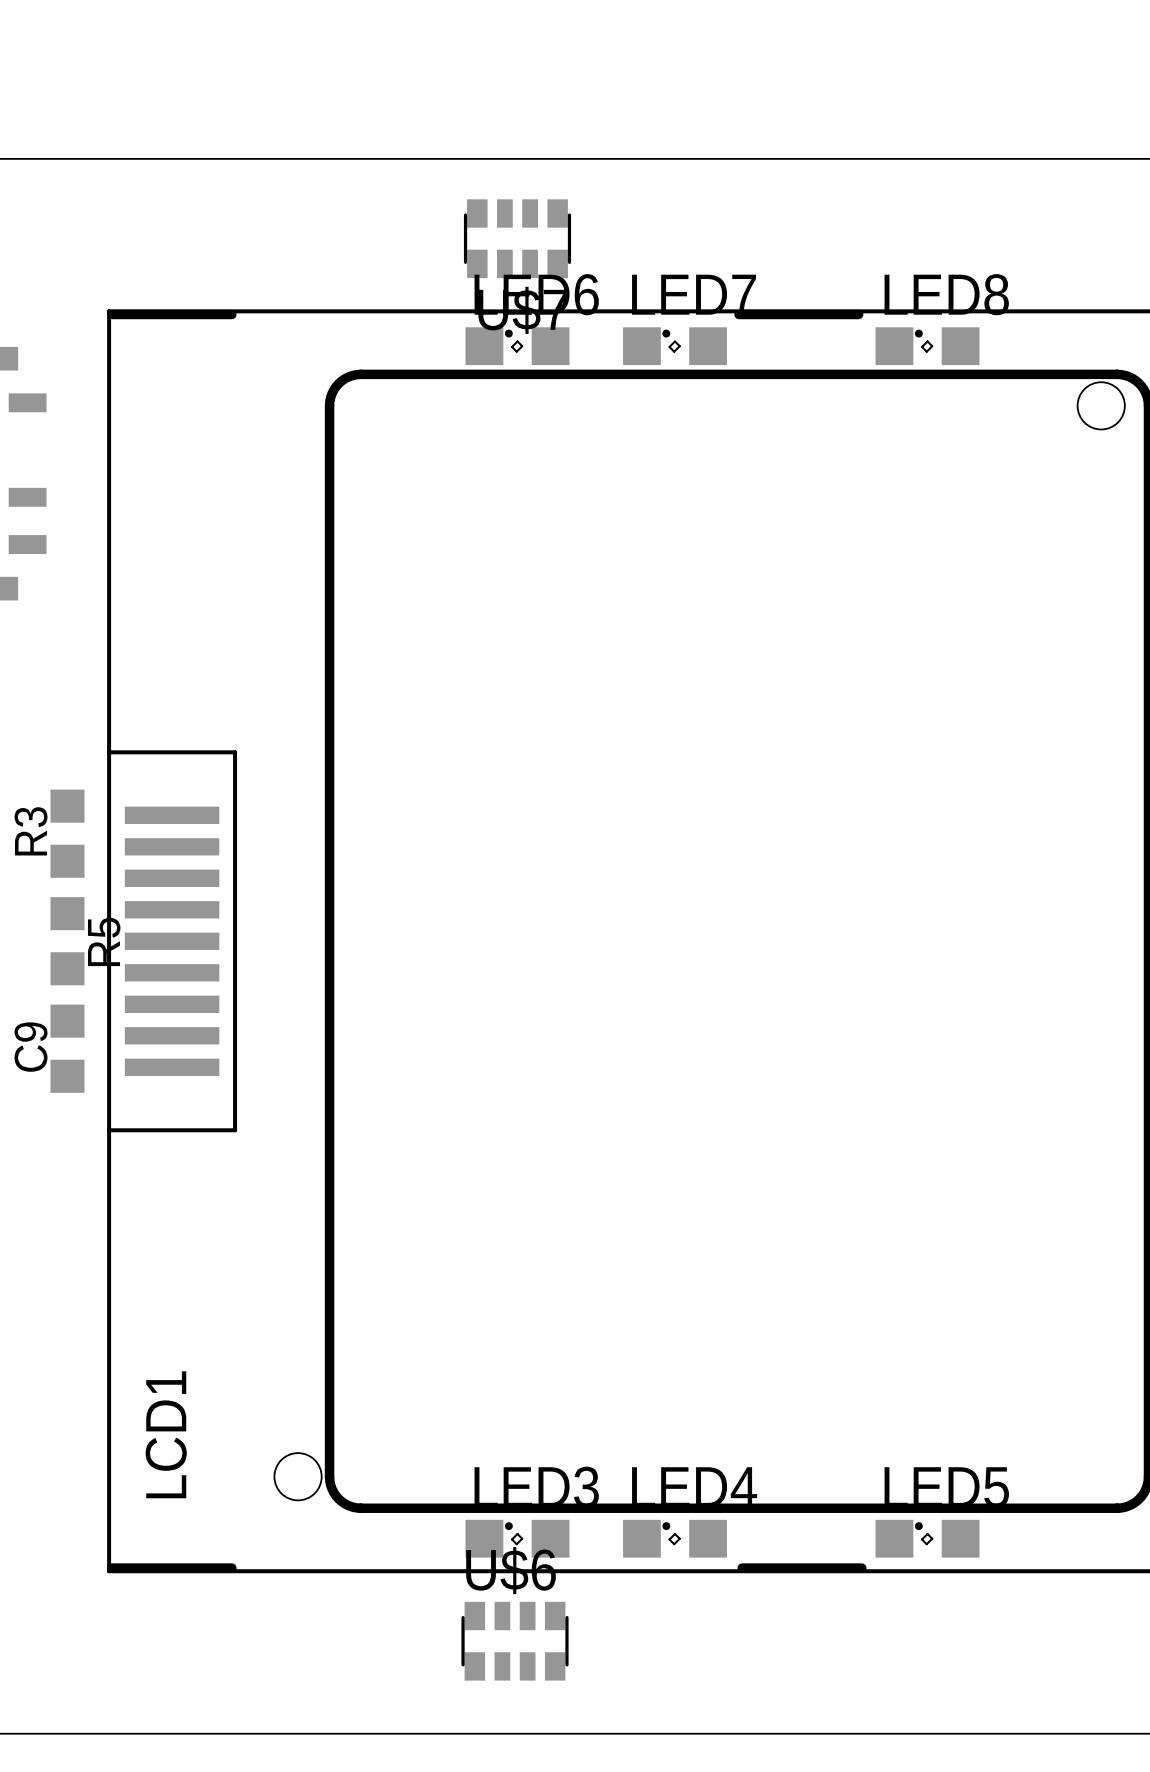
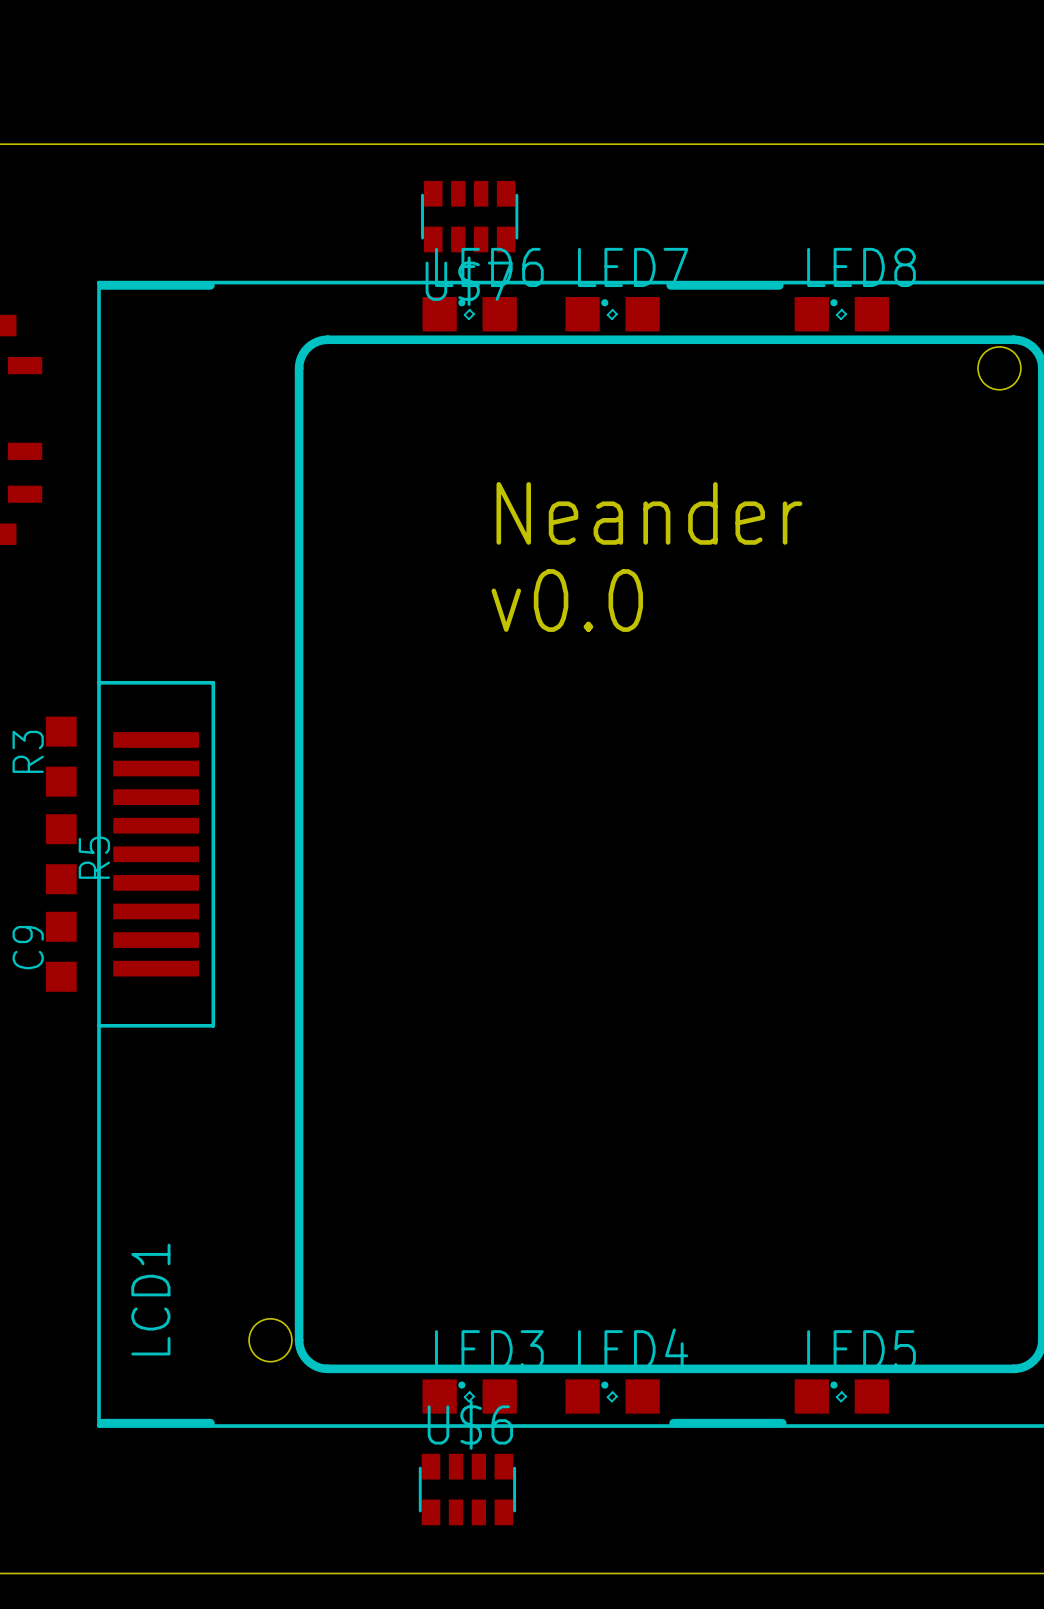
text: none -> Neander (649, 513)
text: none -> v0.0 (567, 600)

